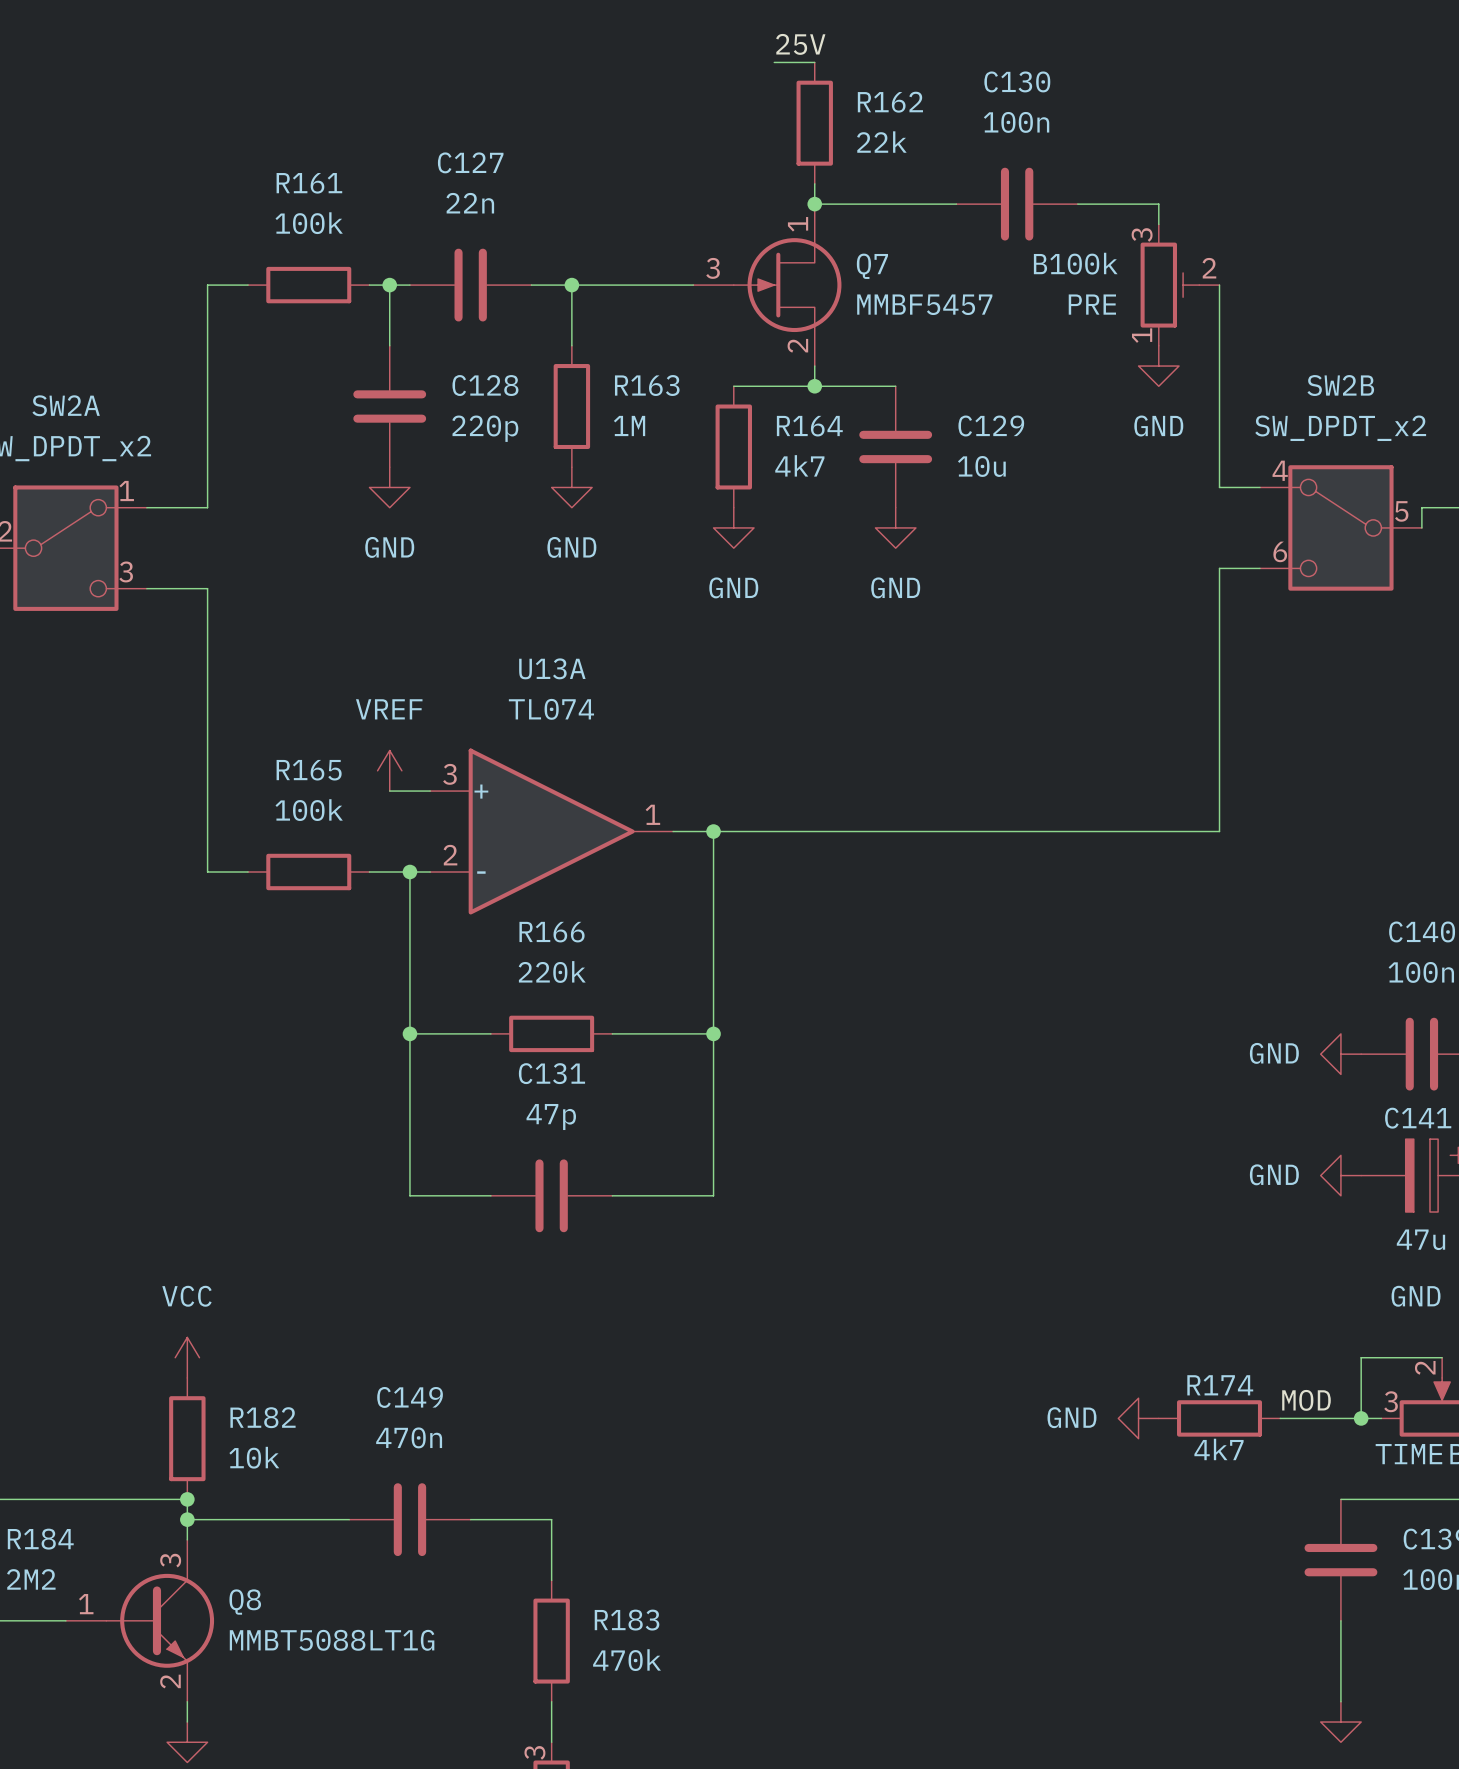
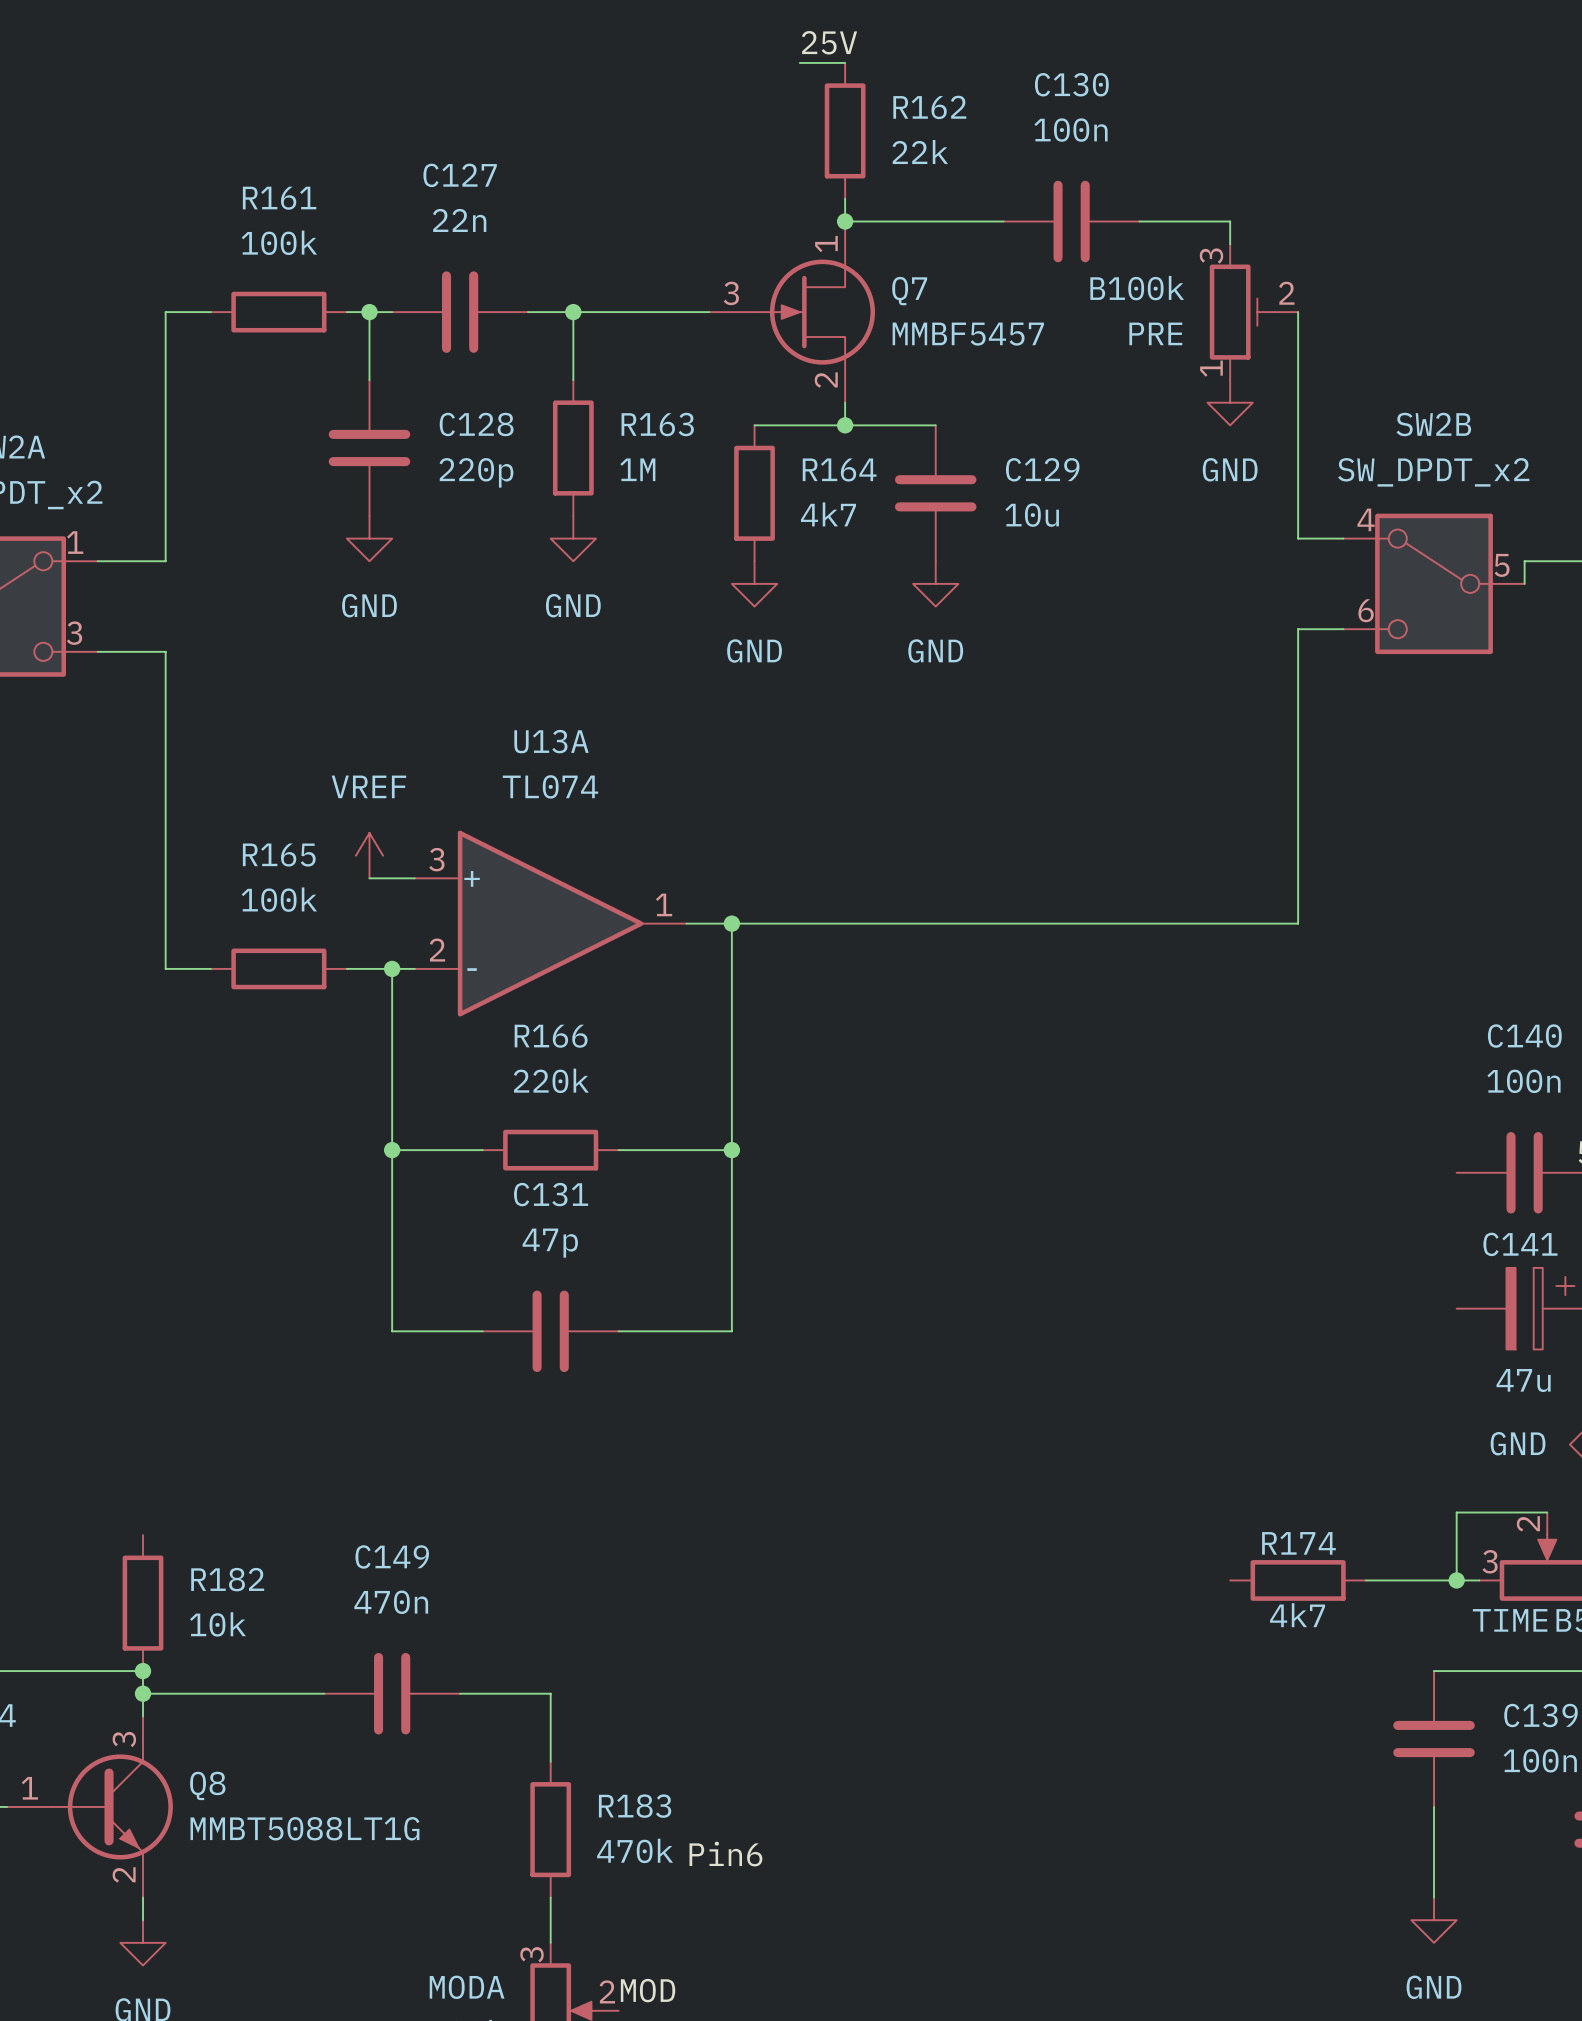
power symbol: GND (1340, 1054) -> none
power symbol: GND (1340, 1175) -> none
power symbol: VCC (187, 1357) -> none
label: MOD (1306, 1400) -> none
power symbol: GND (1138, 1418) -> none
label: none -> Pin6 (725, 1854)

